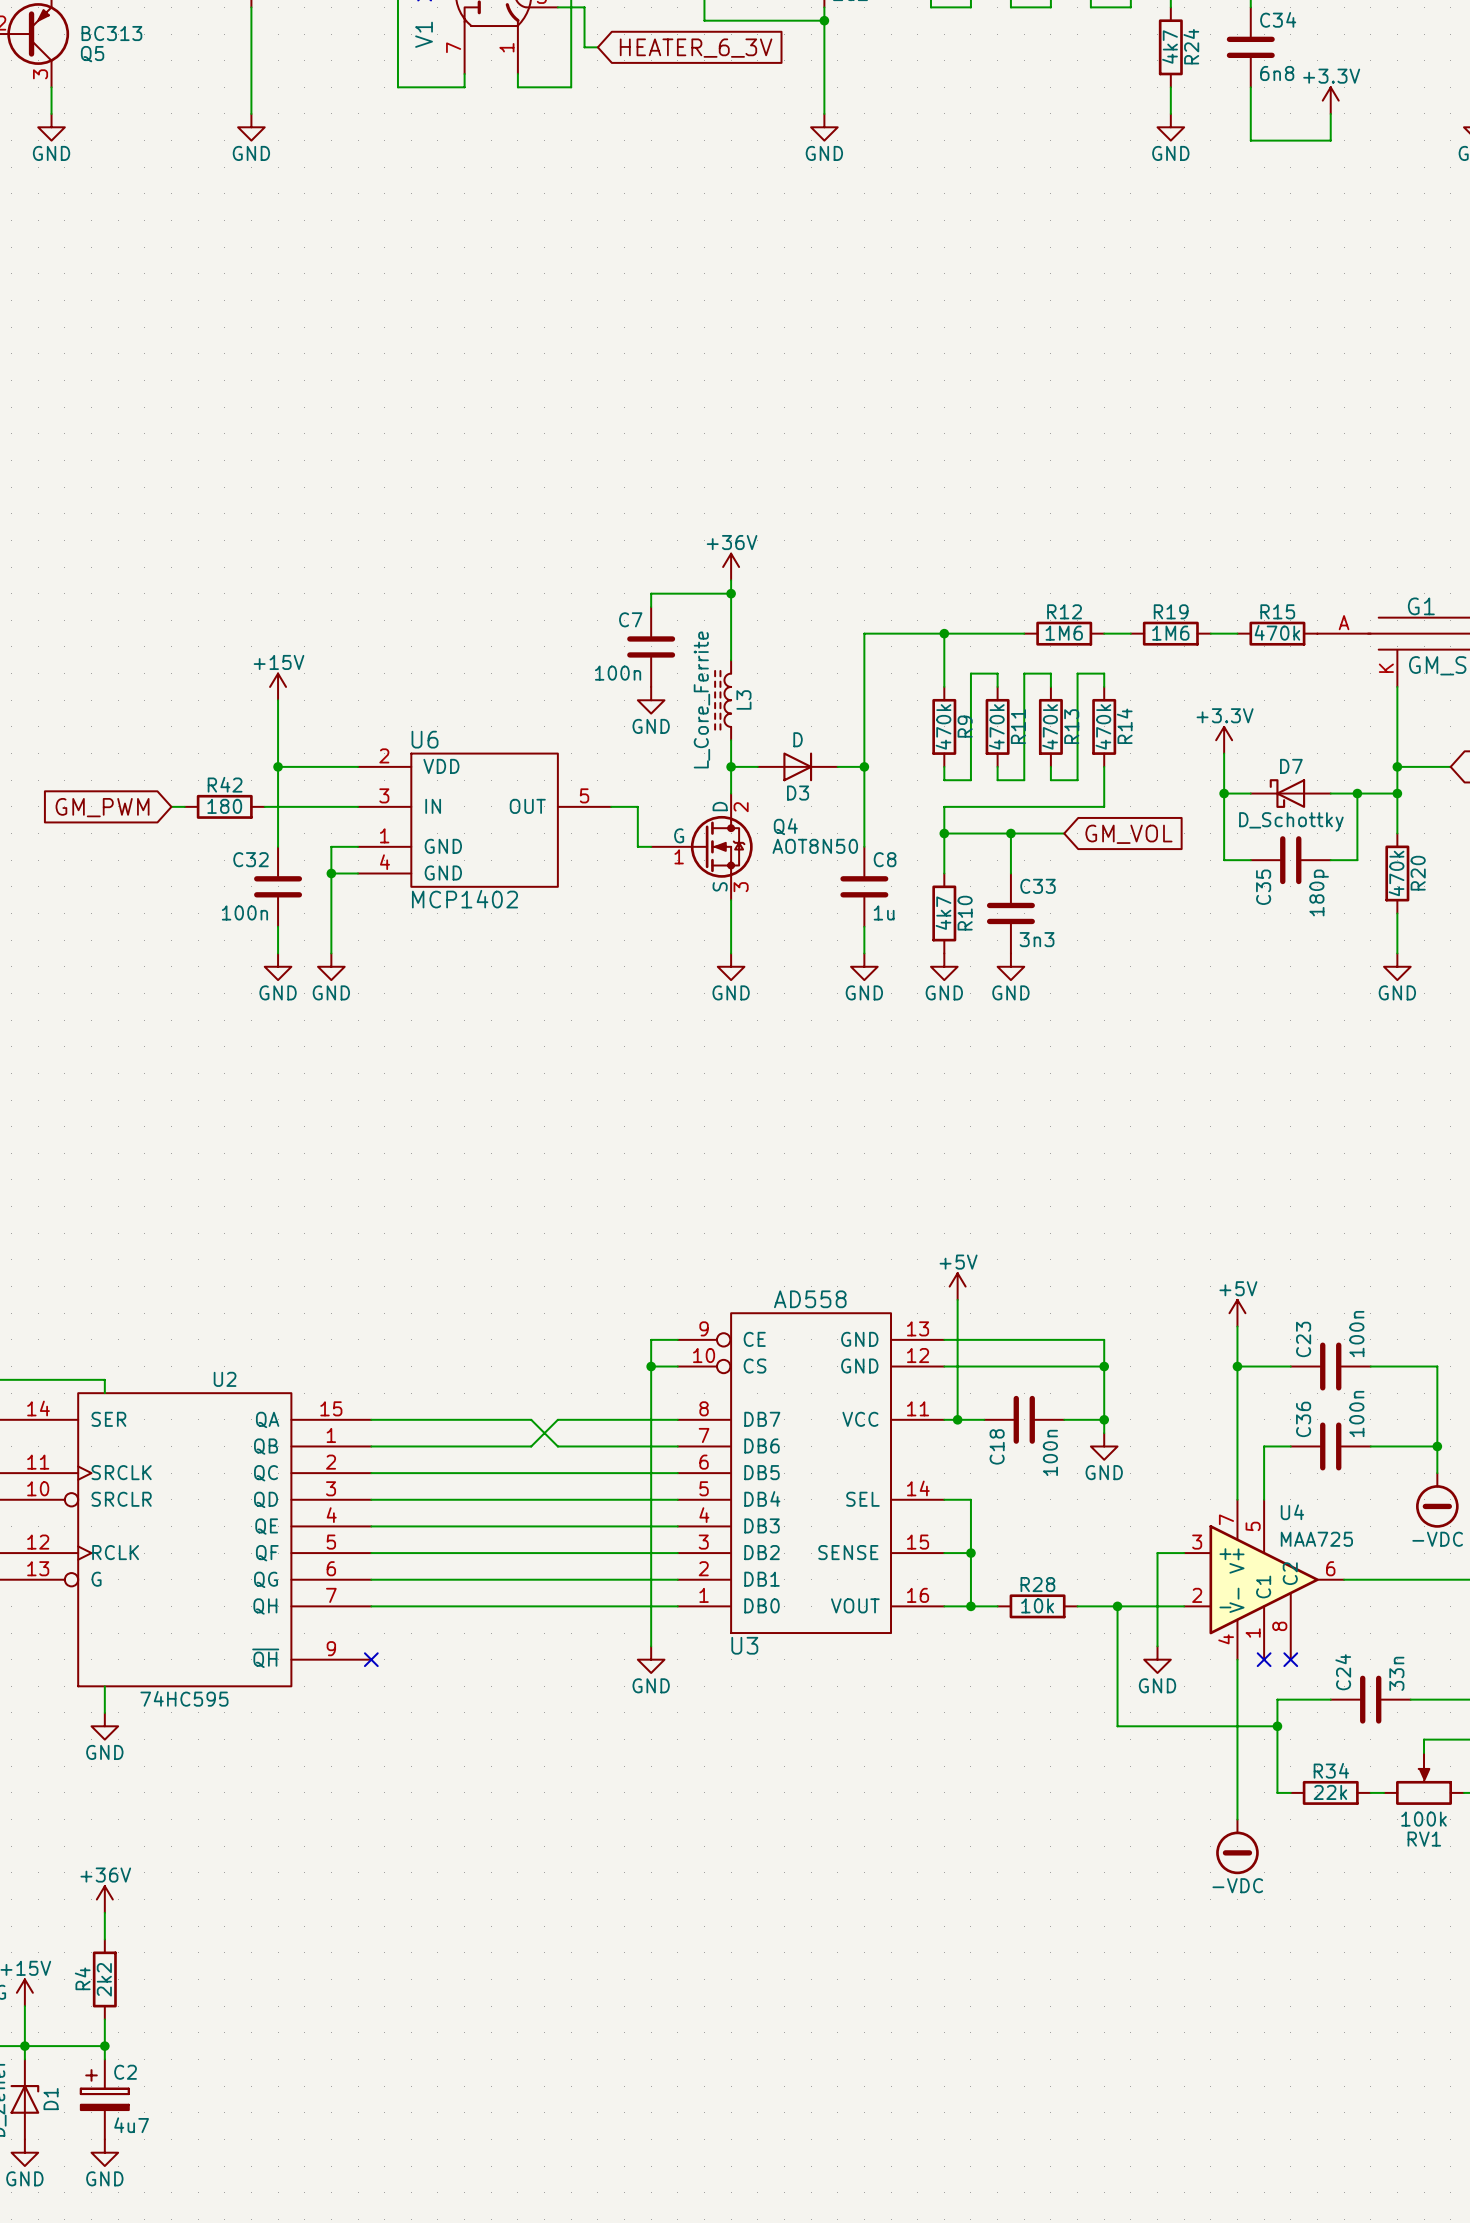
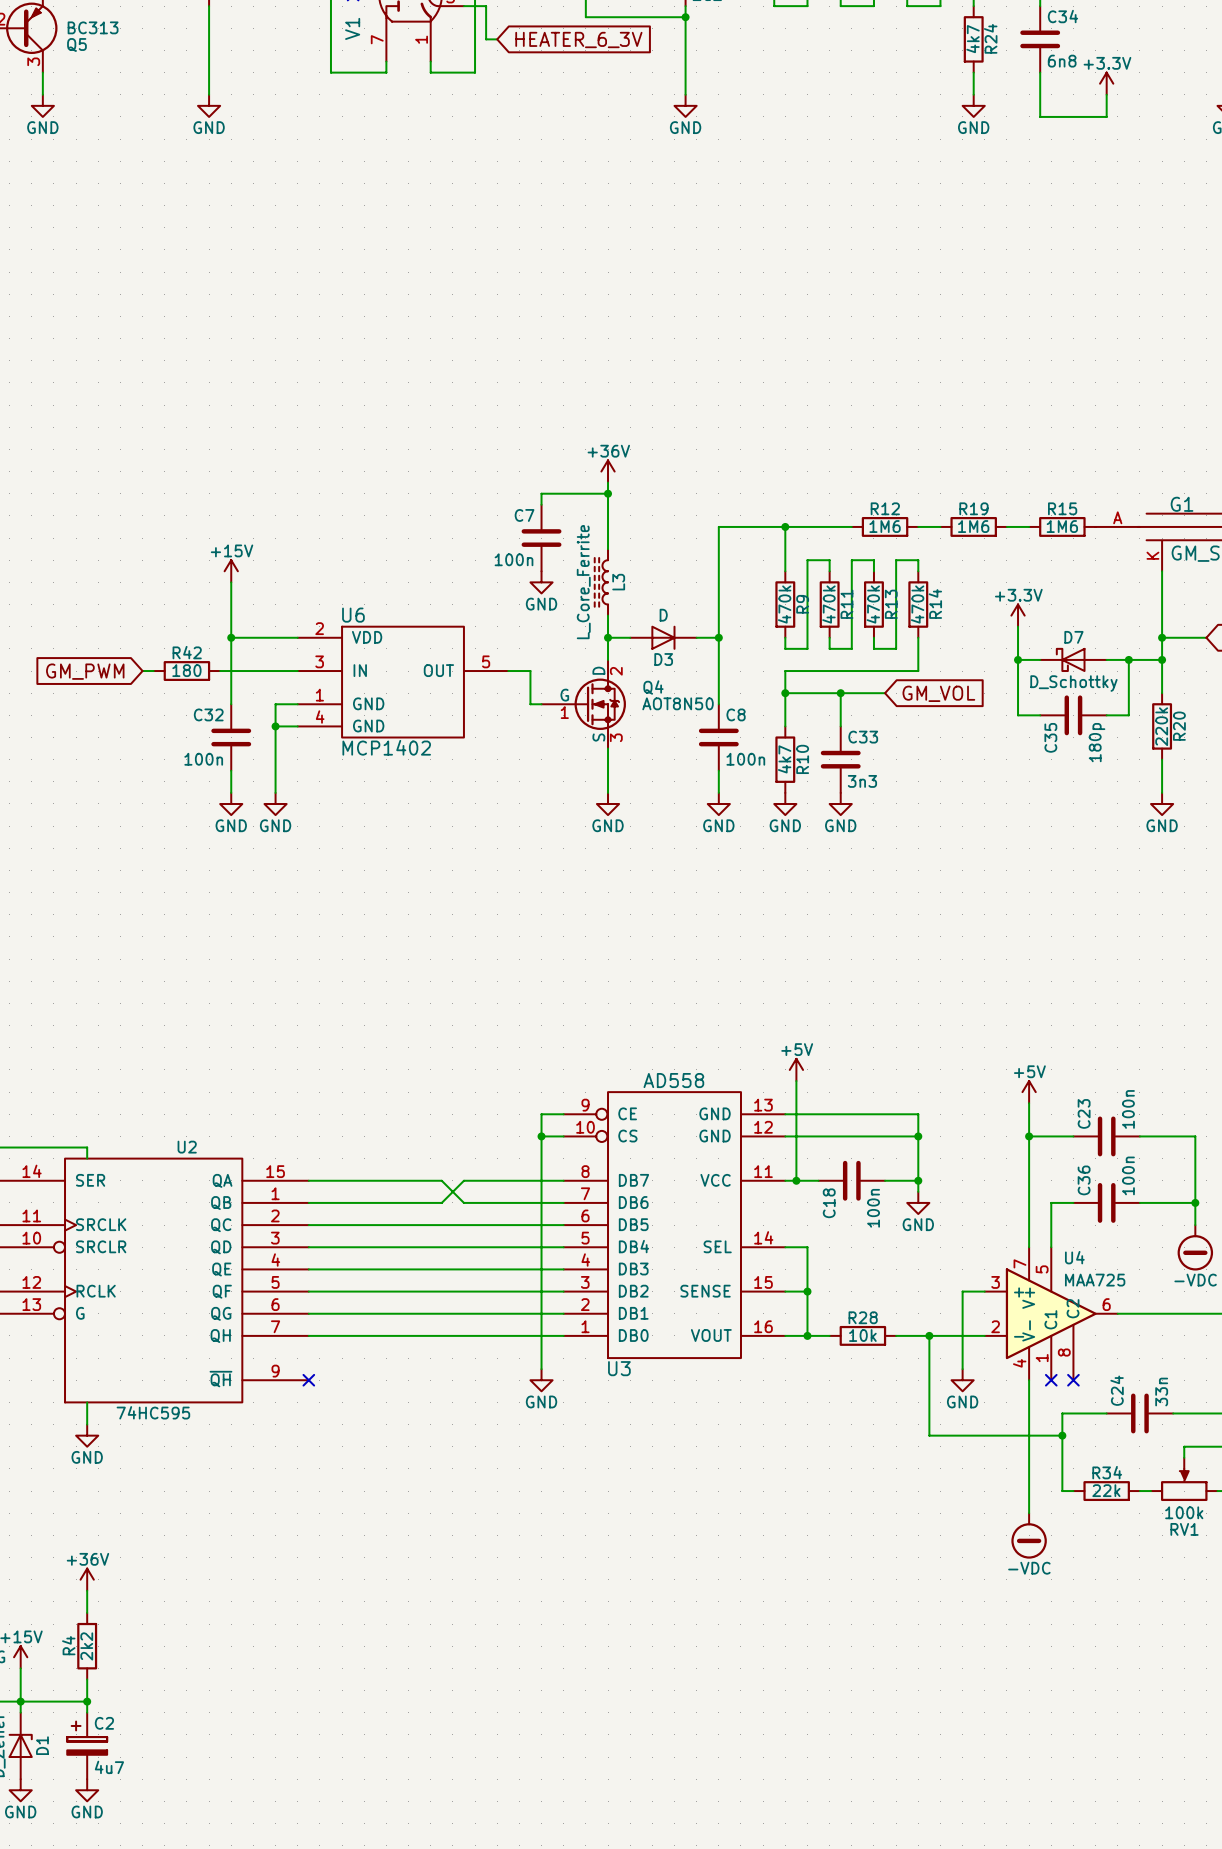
R15 value: 470k (1277, 632) -> 1M6 (1062, 526)
R20 value: 470k (1396, 873) -> 220k (1161, 726)
C8 value: 1u (884, 912) -> 100n (745, 759)

